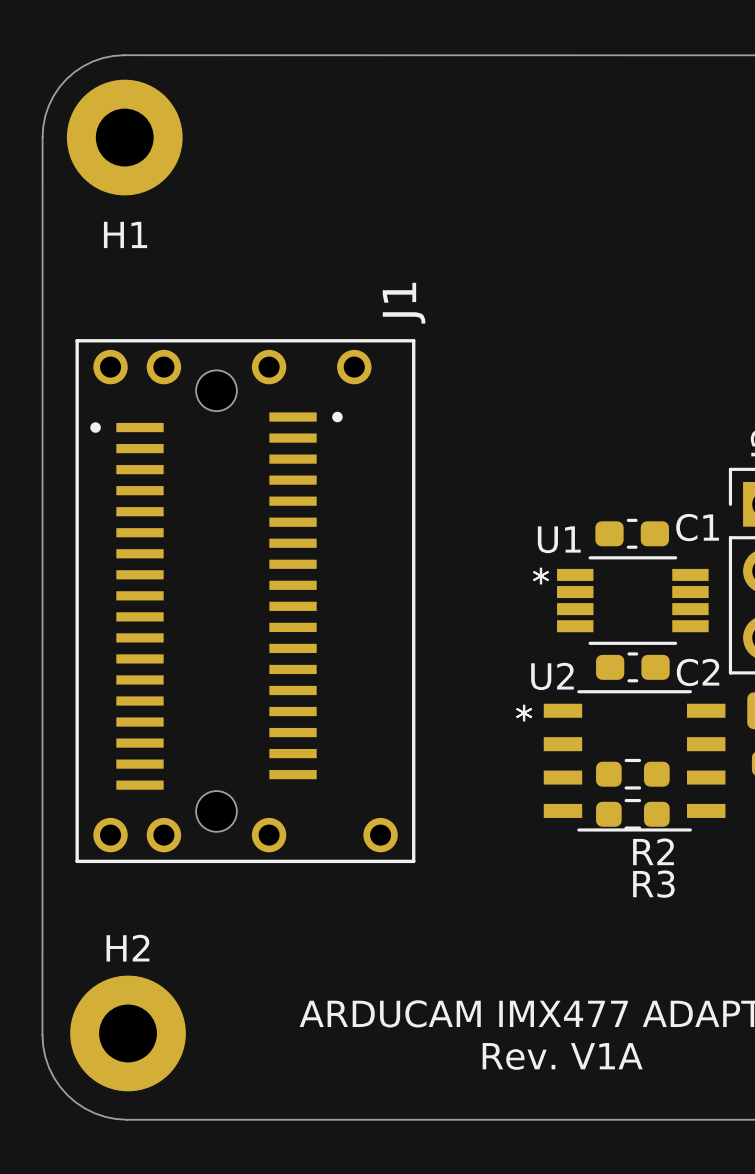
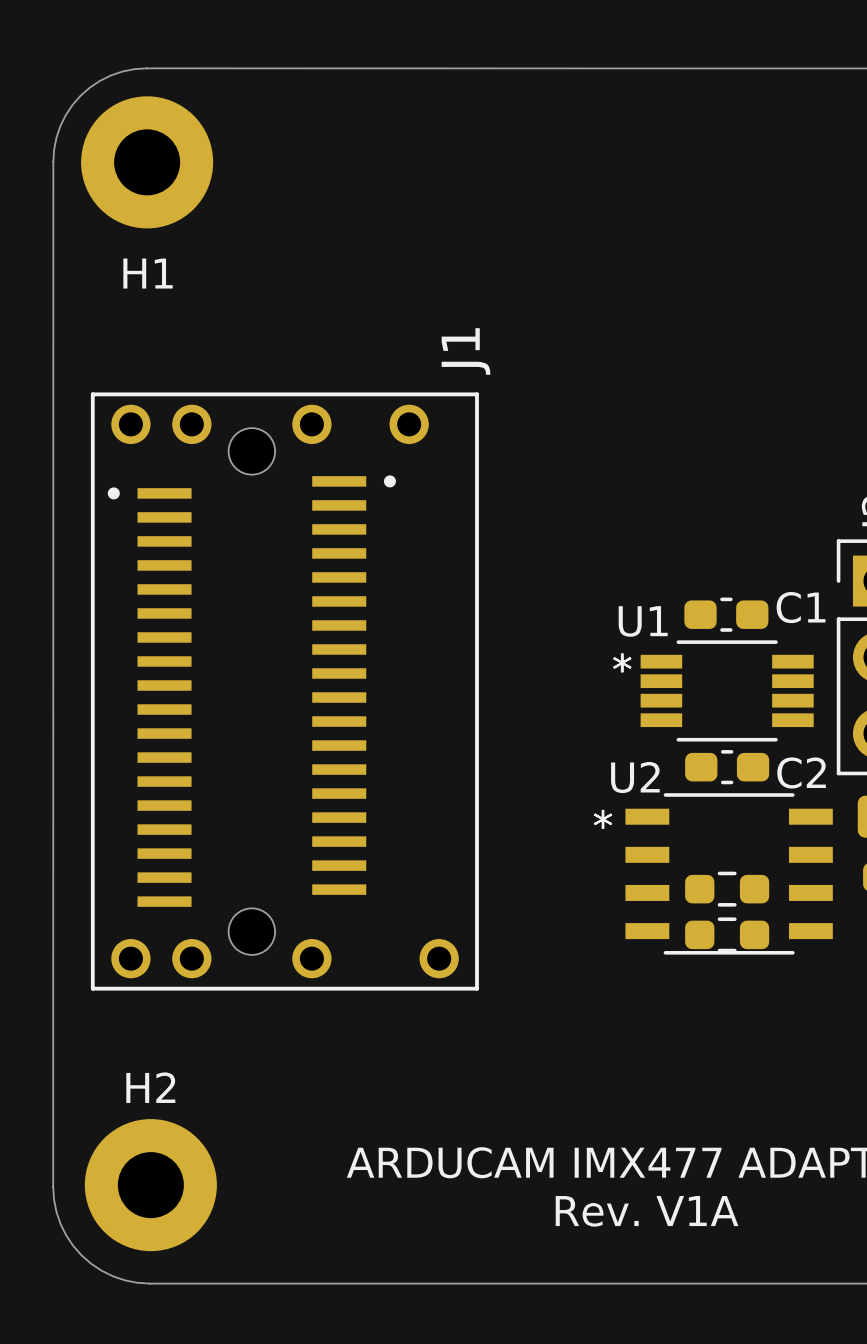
R2 name: R2 (653, 851) -> none
R3 name: R3 (653, 884) -> none

